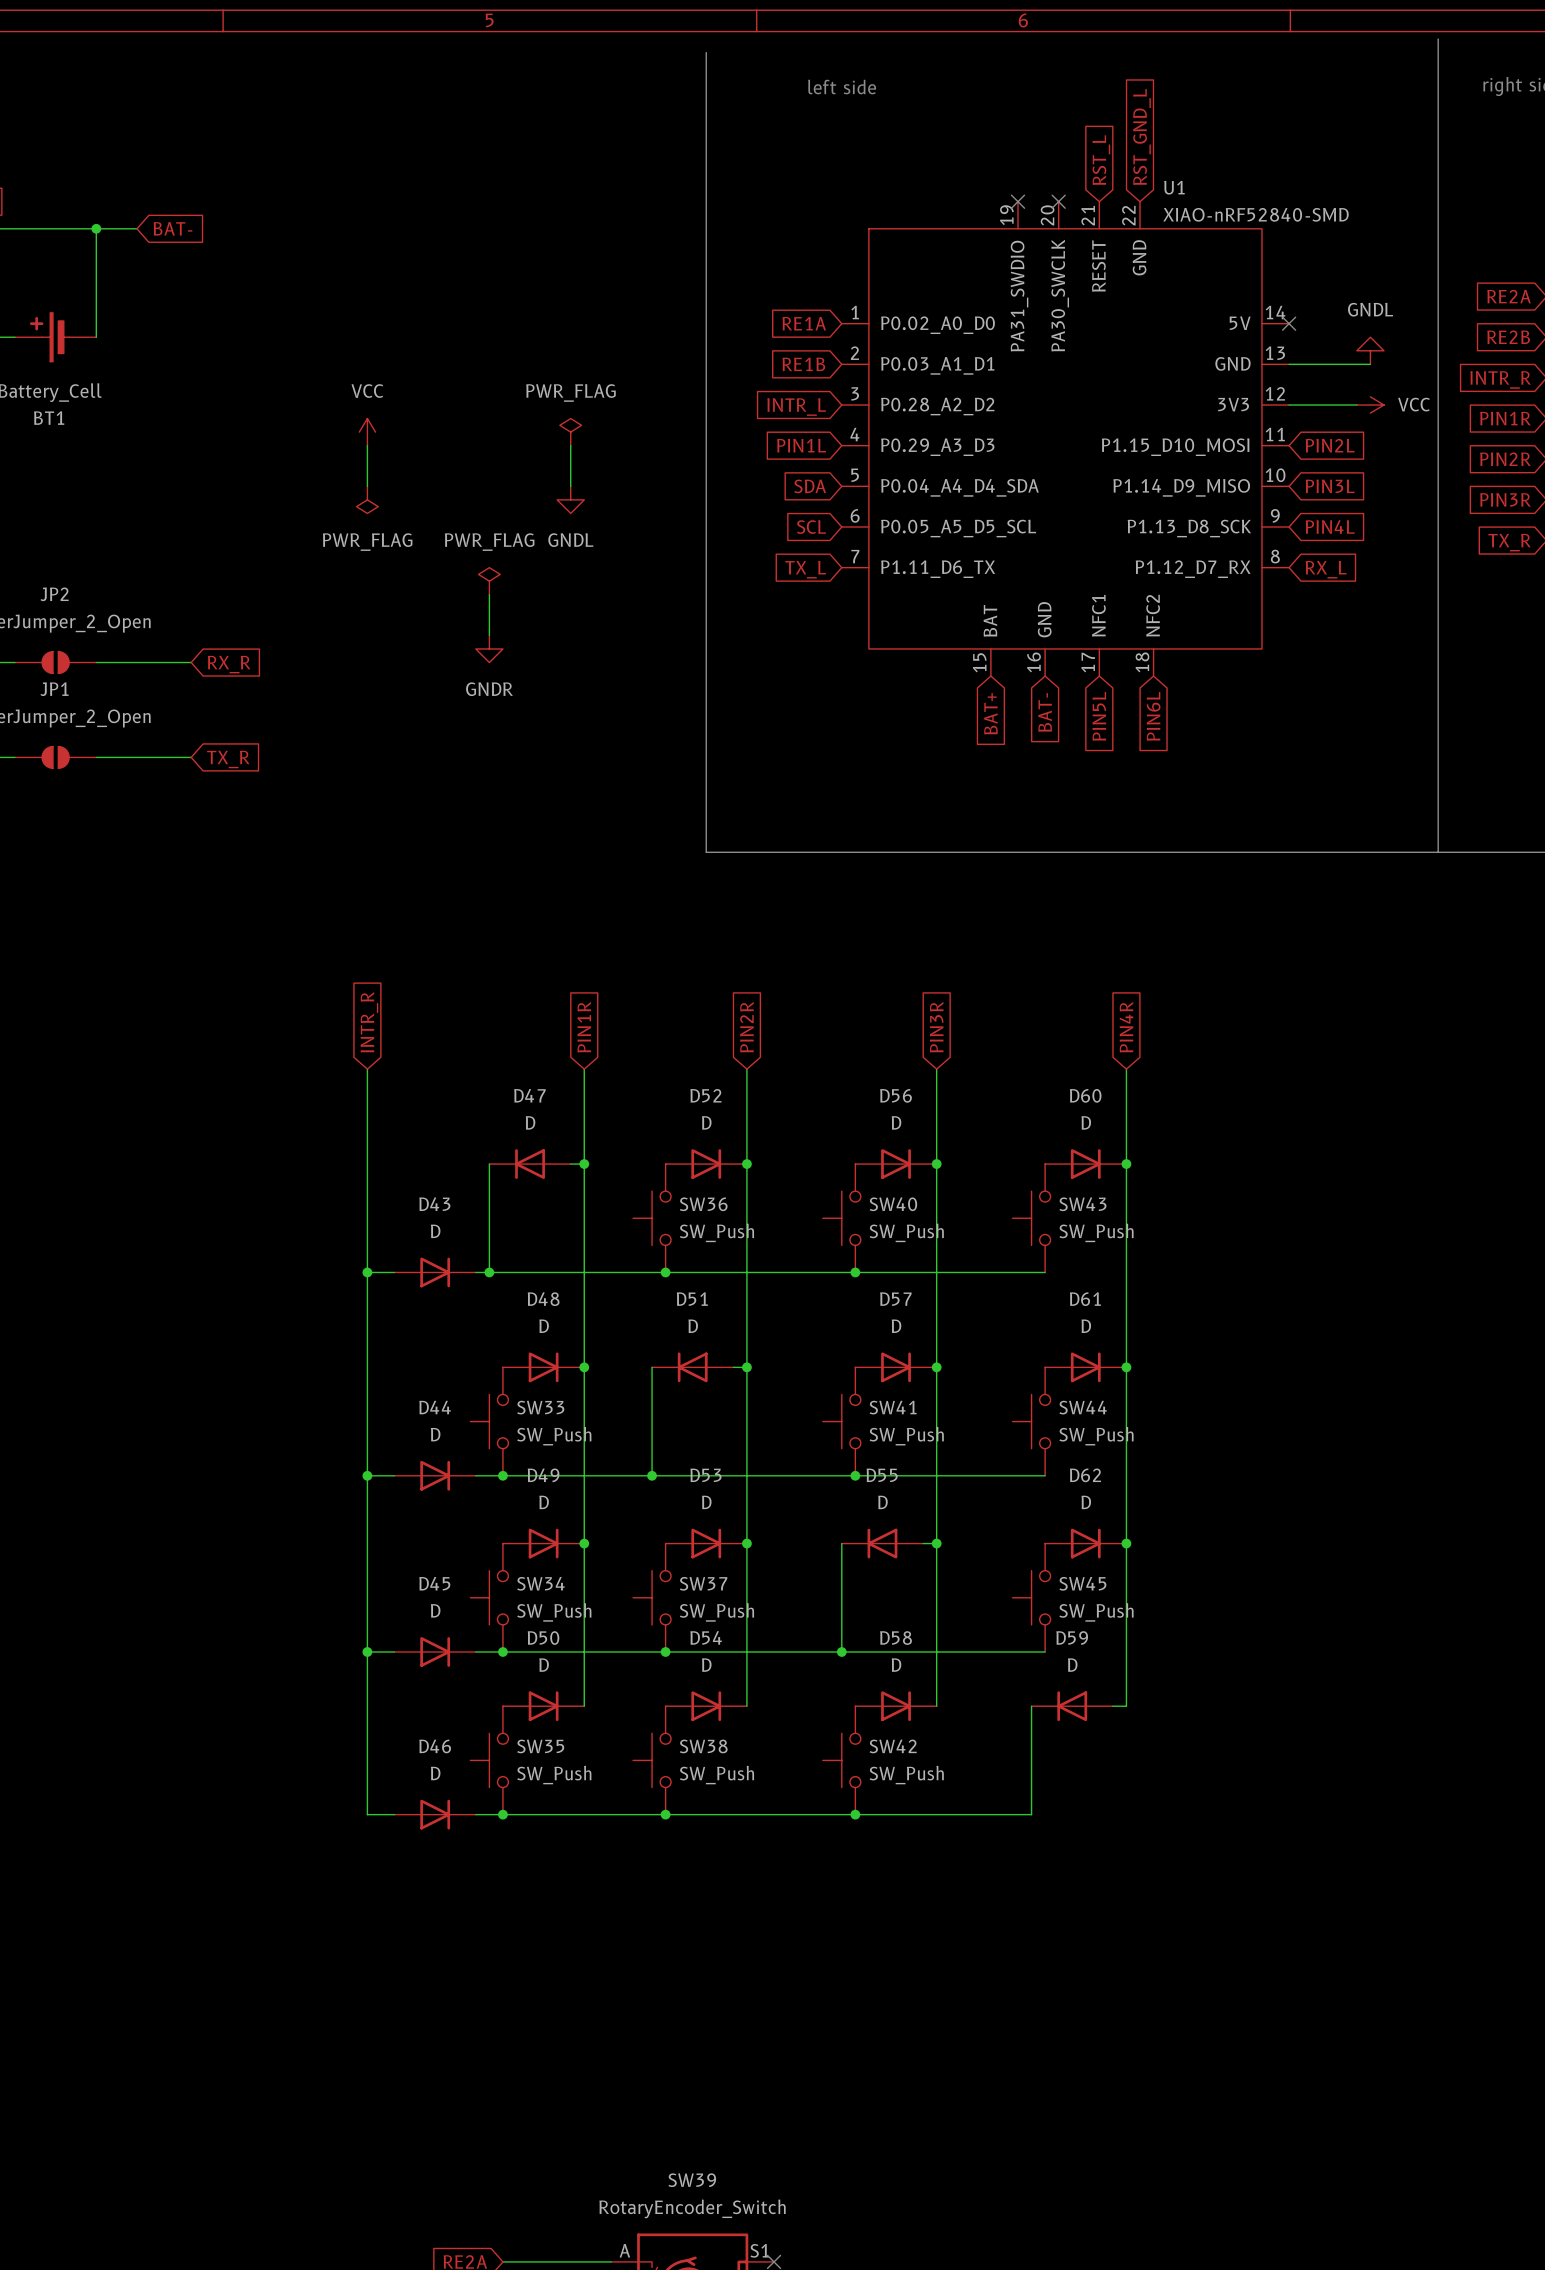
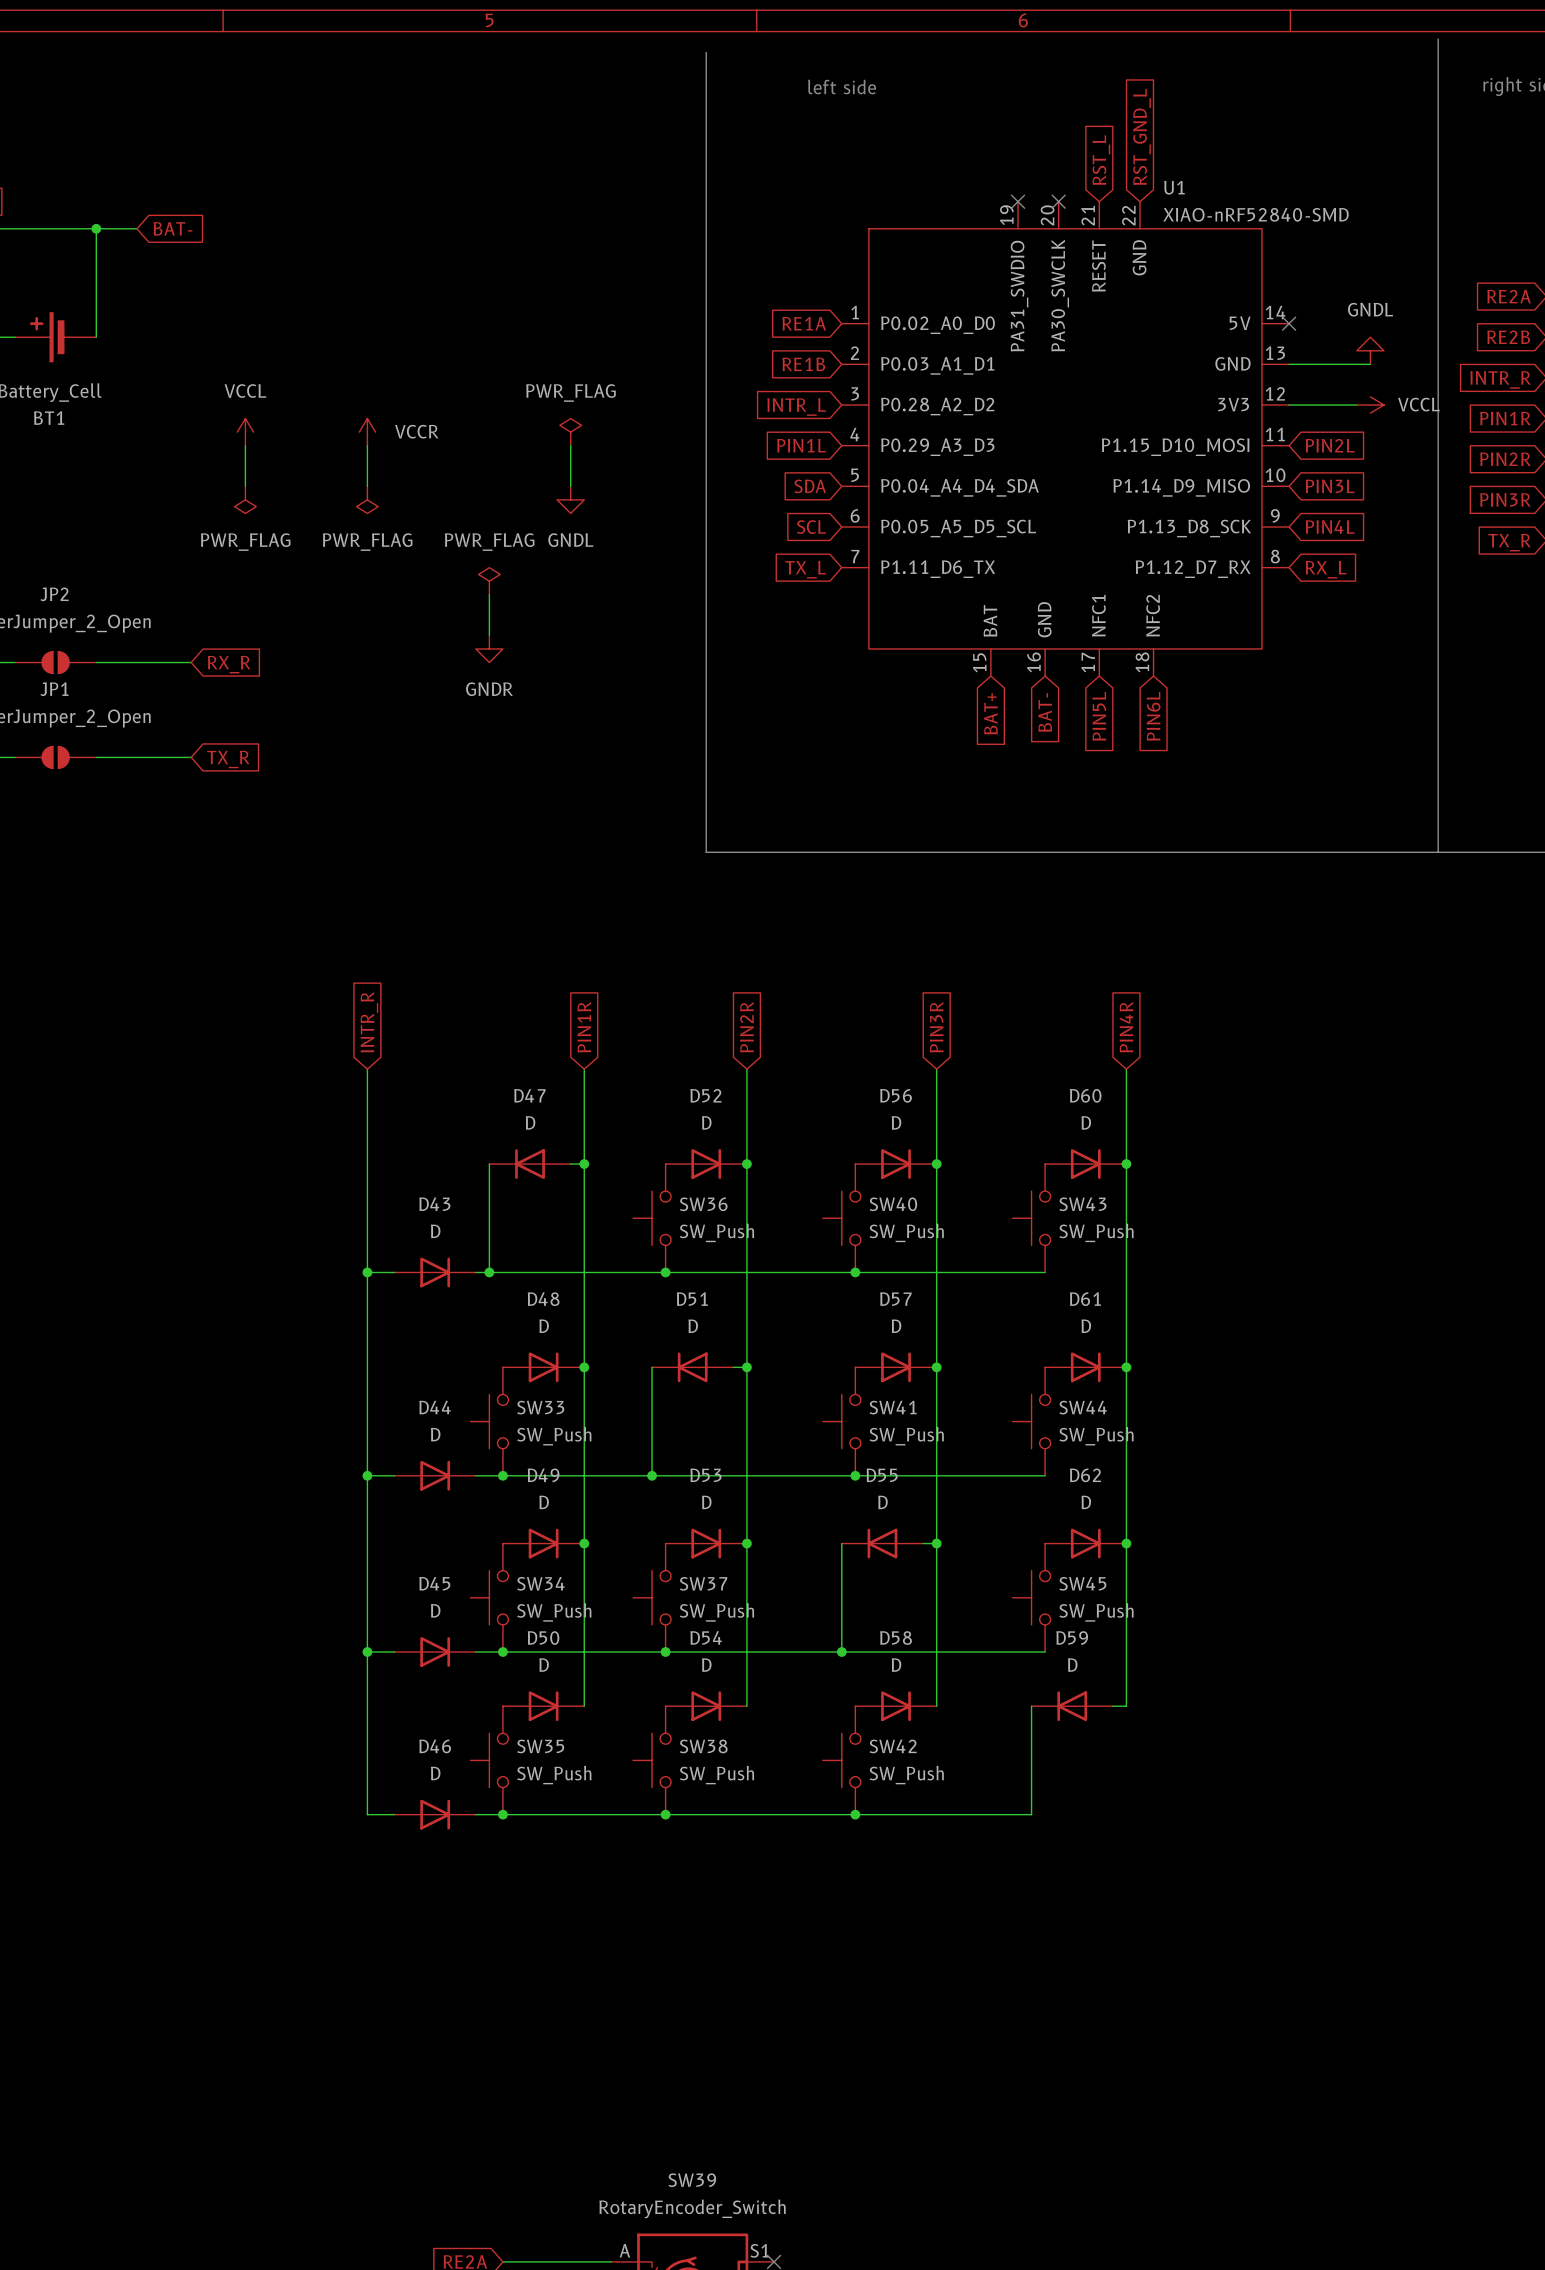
power symbol: VCC (1370, 405) -> VCCL (1370, 405)
power symbol: none -> VCCL (245, 432)
power symbol: VCC (367, 432) -> VCCR (367, 432)
wire: none -> (245, 445) (245, 486)
power symbol: none -> PWR_FLAG (245, 499)

